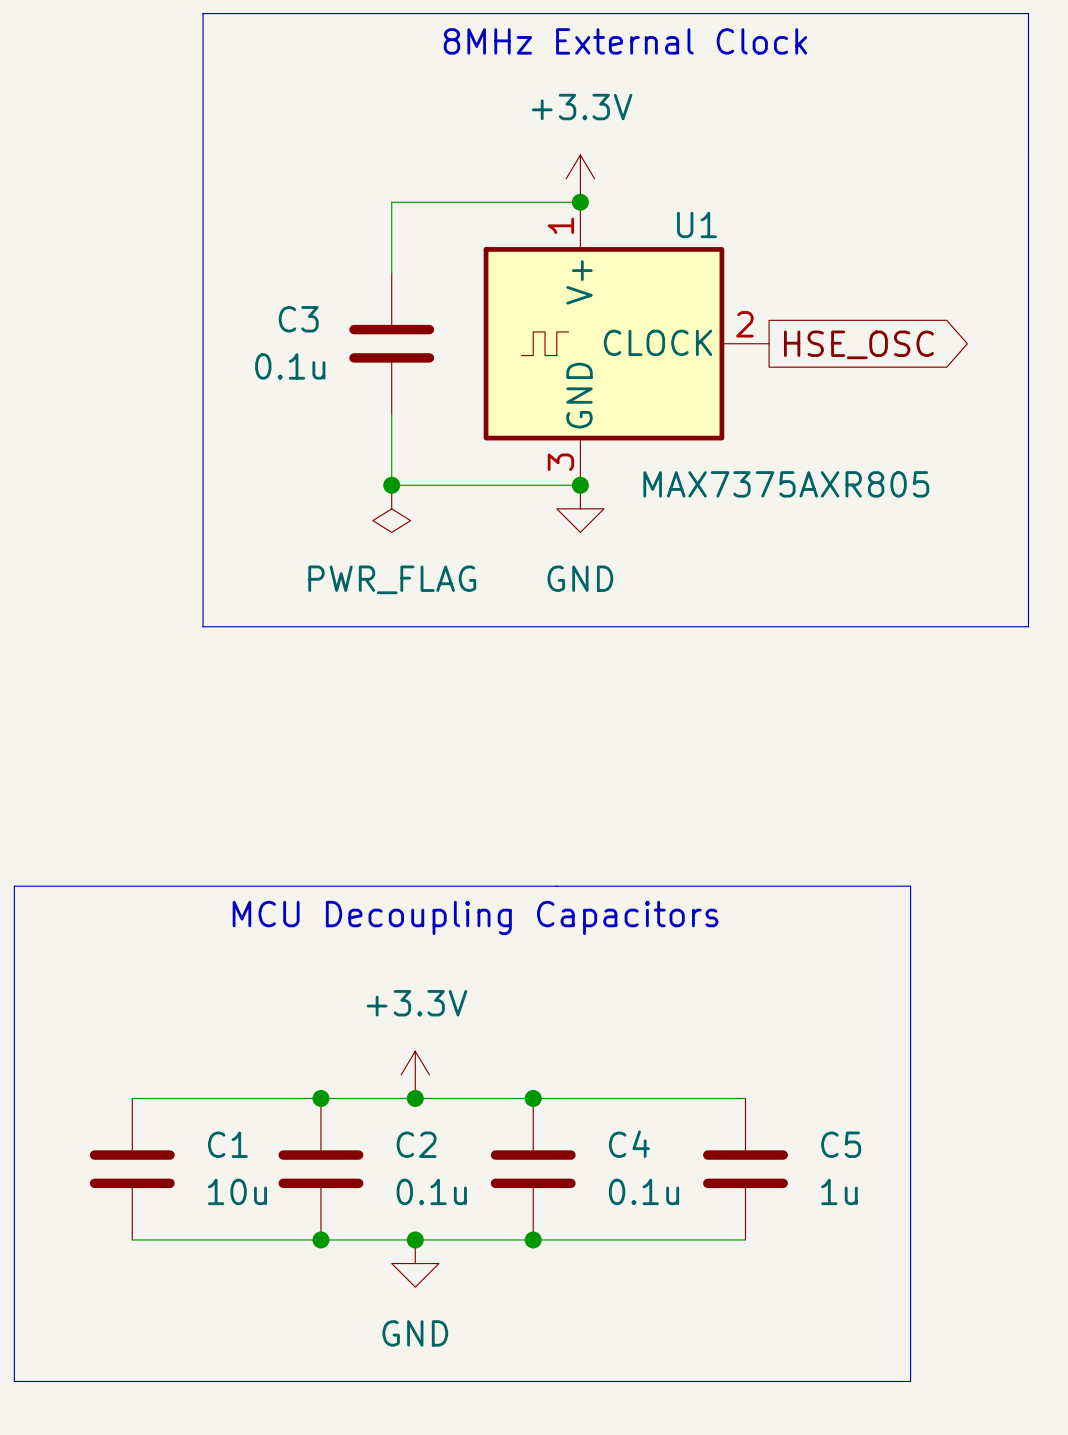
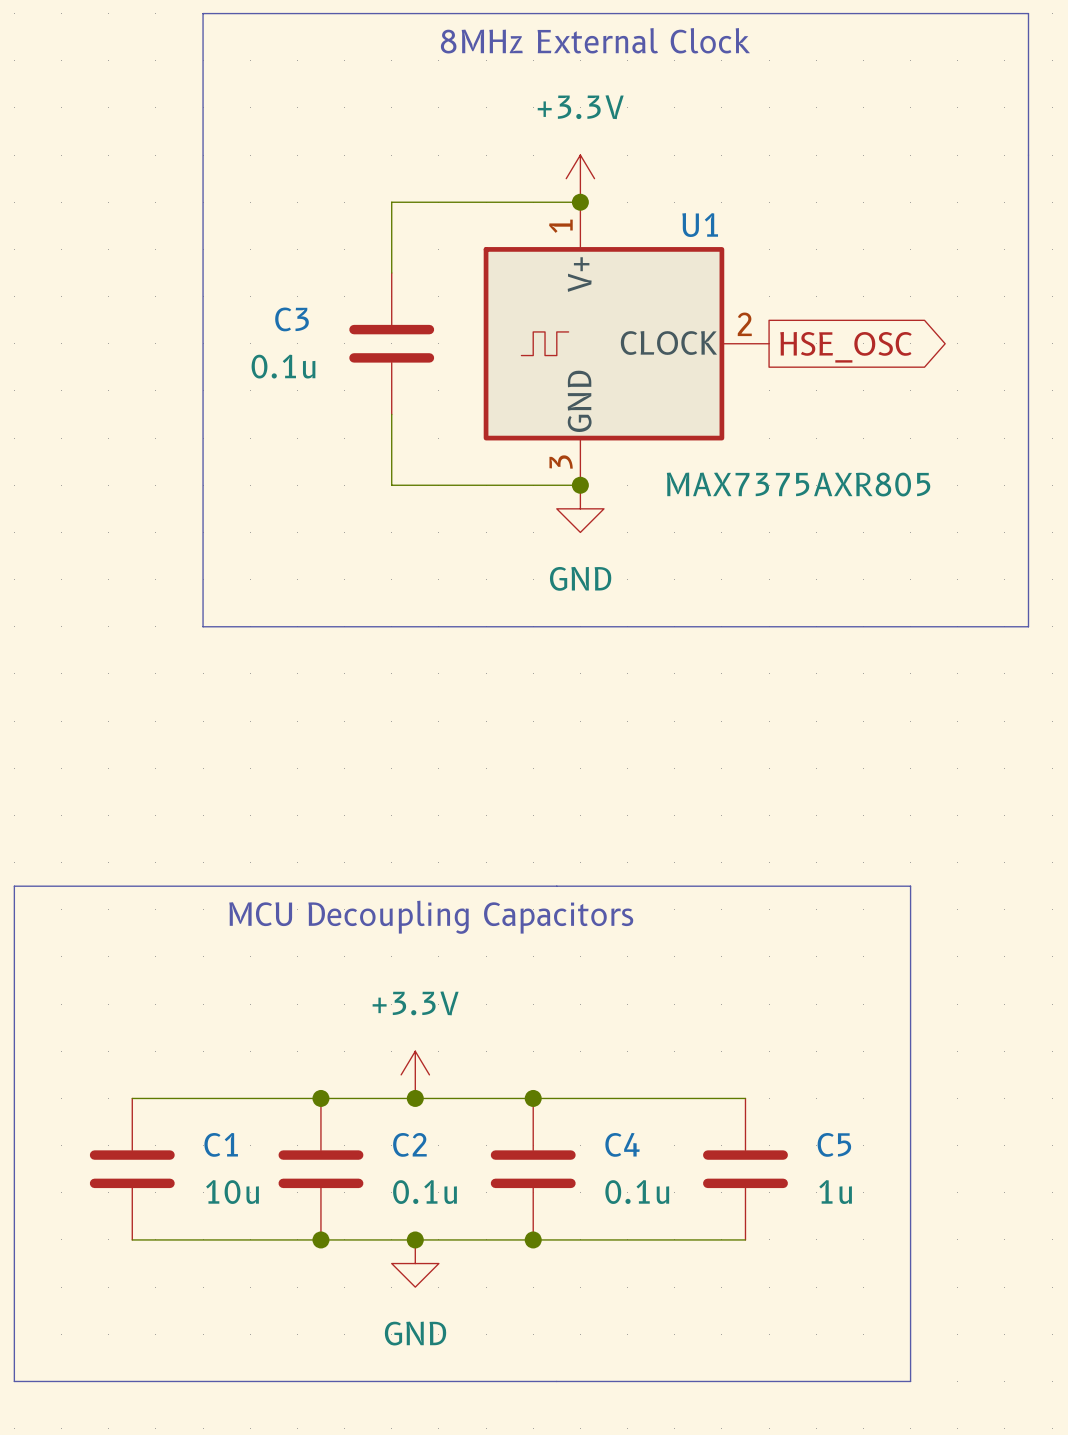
junction: (391, 485) -> none
power symbol: PWR_FLAG (391, 508) -> none

